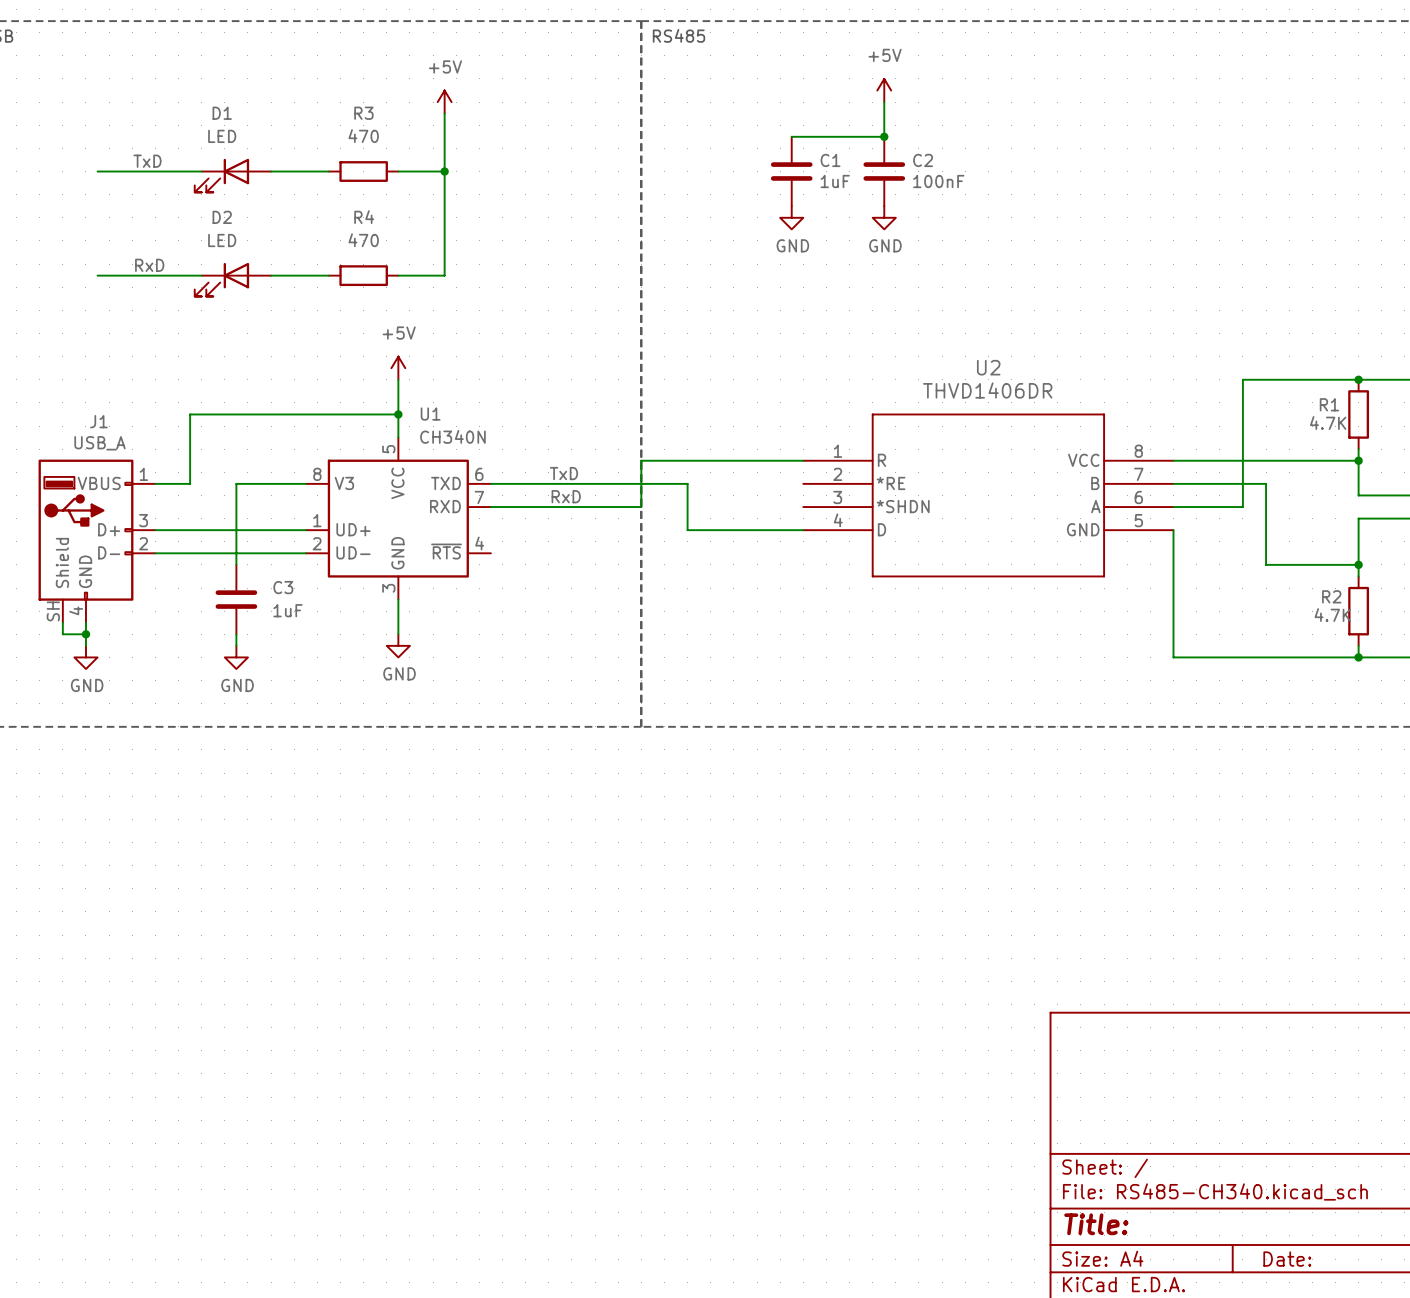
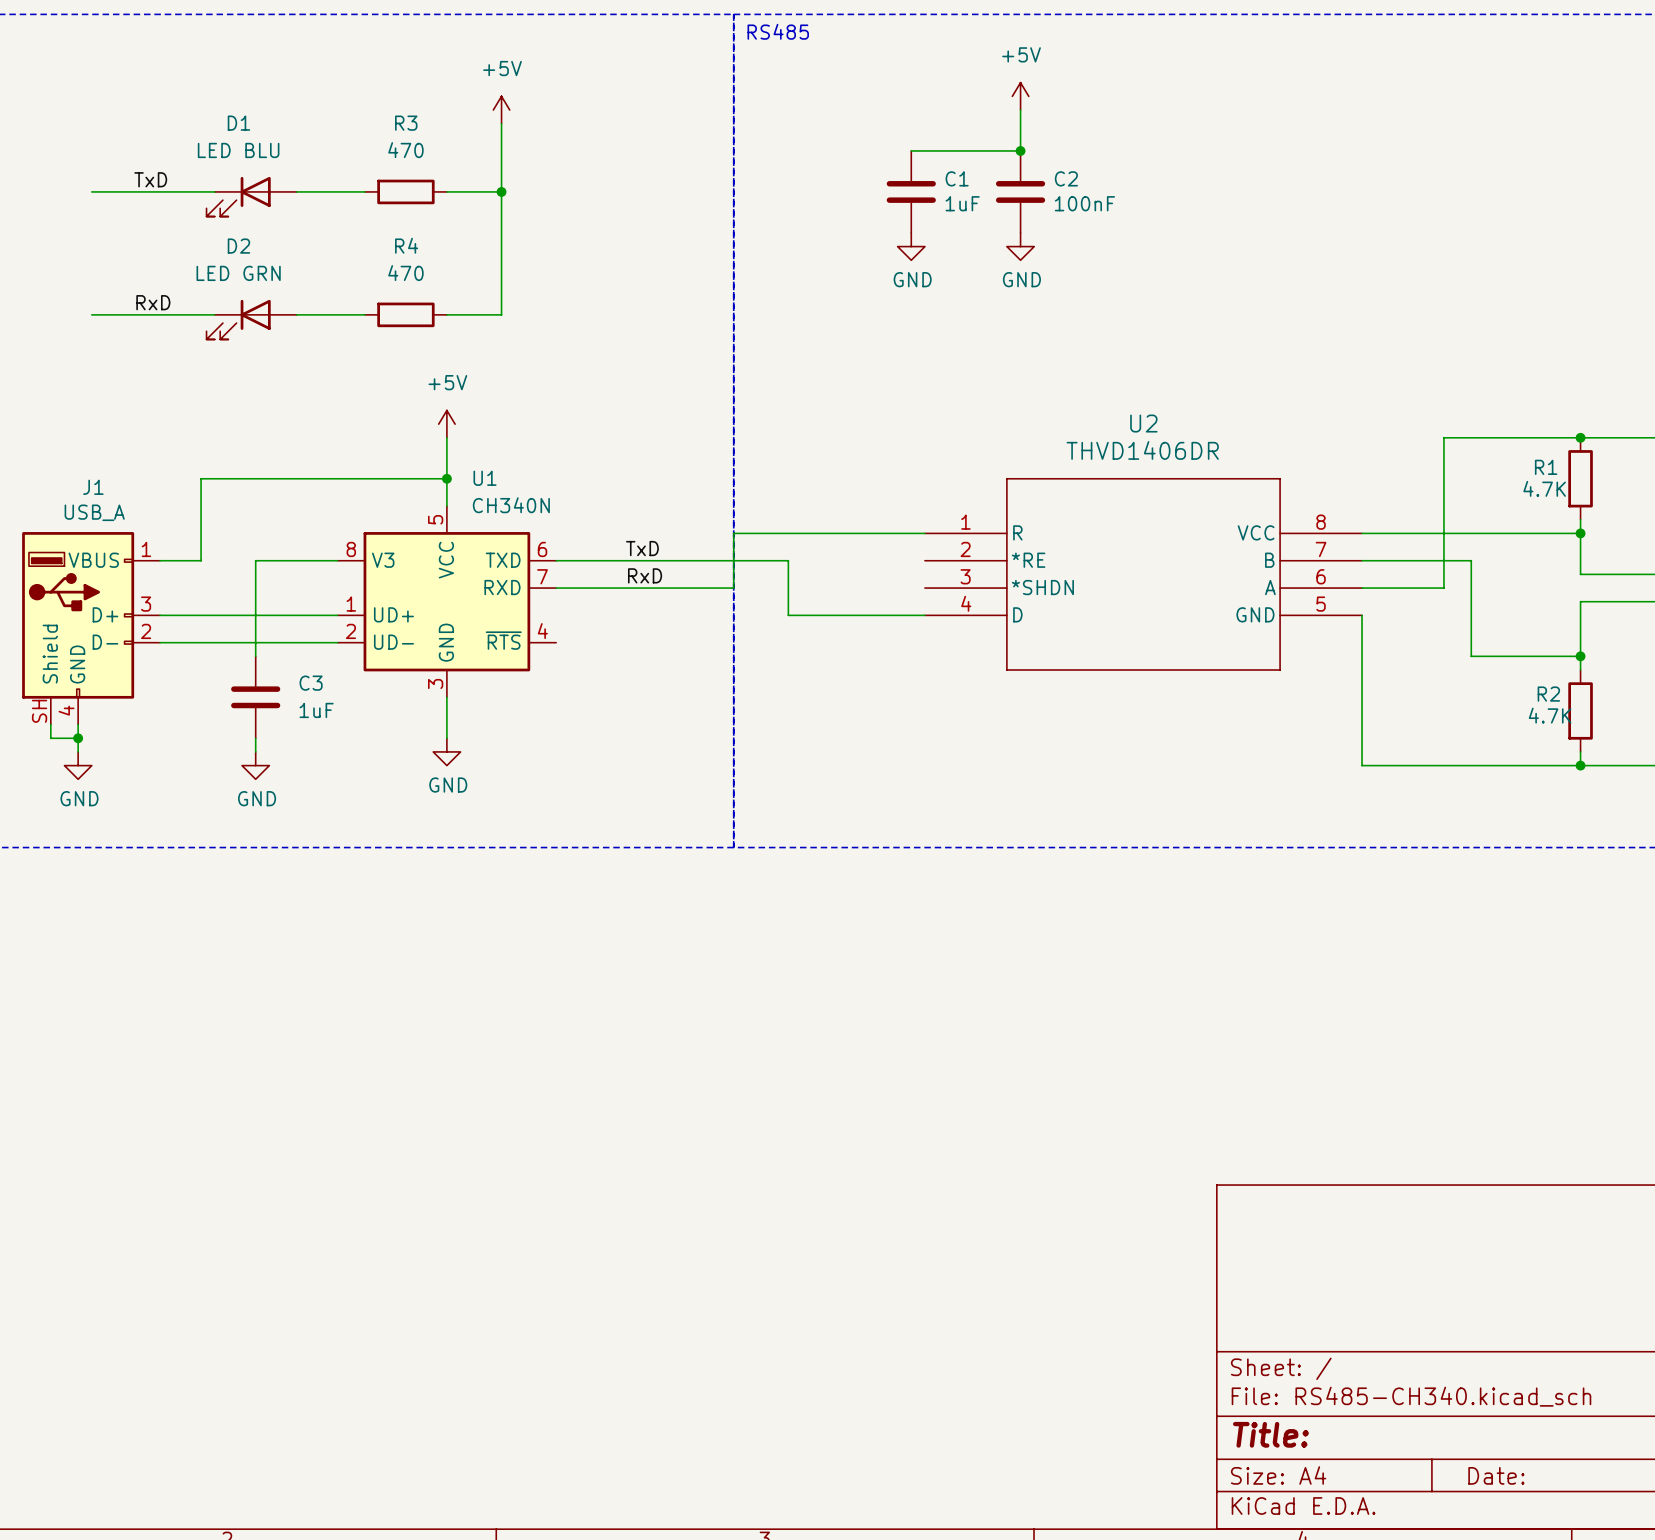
D1 value: LED (222, 136) -> LED BLU (238, 150)
D2 value: LED (222, 240) -> LED GRN (238, 273)

